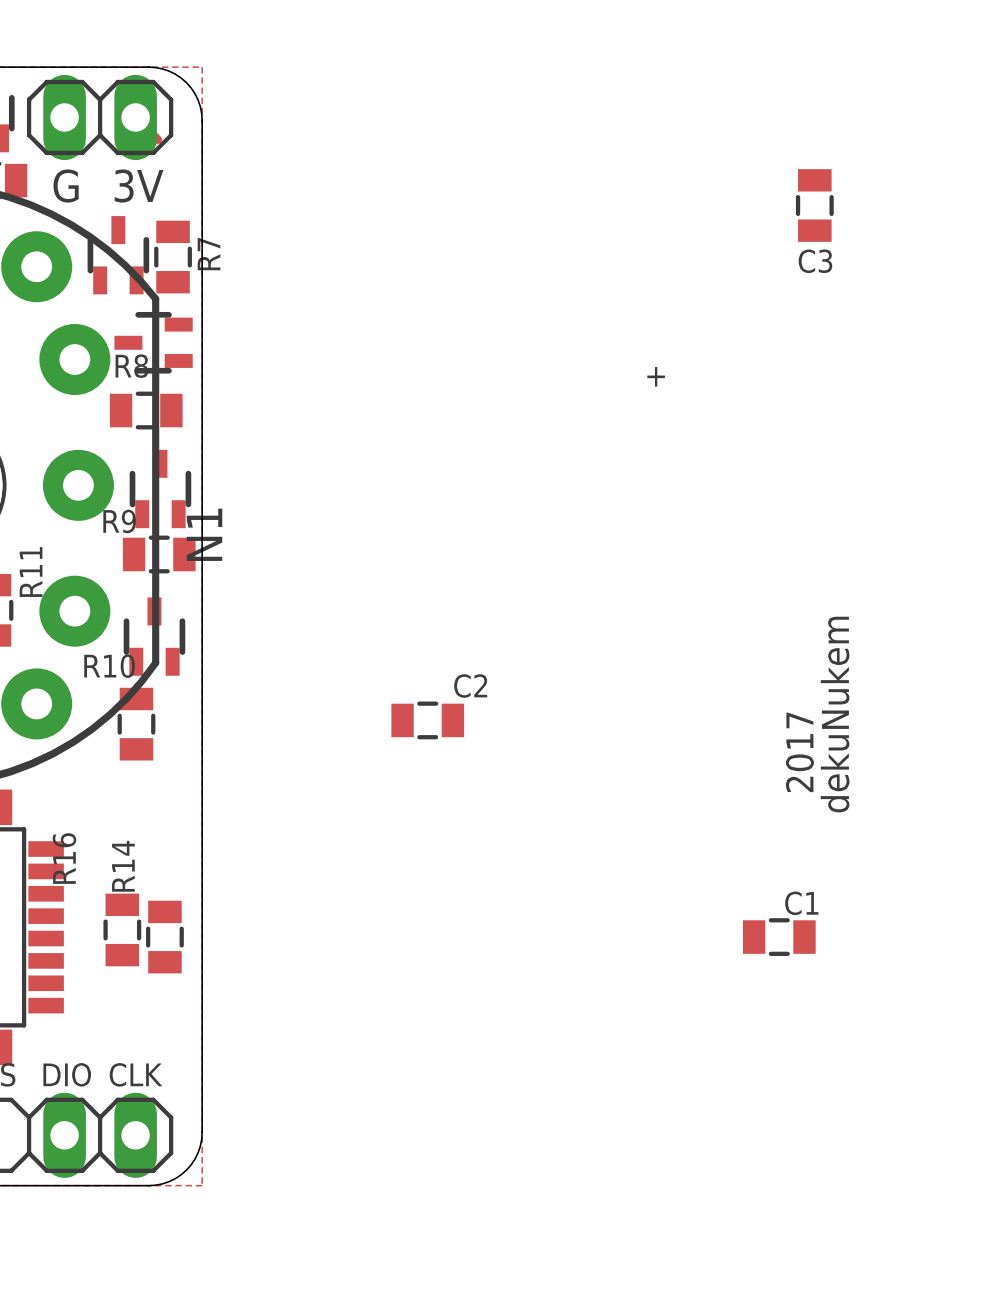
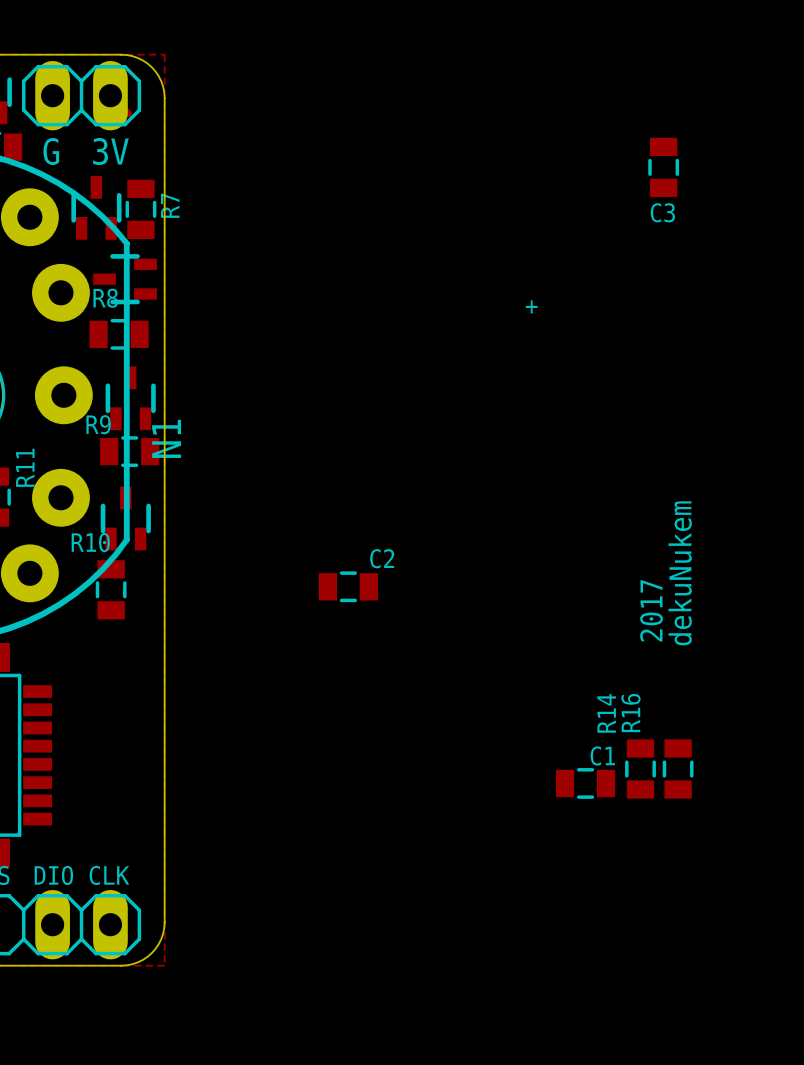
R16 position: (122, 929) -> (678, 769)
R14 position: (164, 937) -> (640, 769)
C1 position: (779, 937) -> (585, 783)

